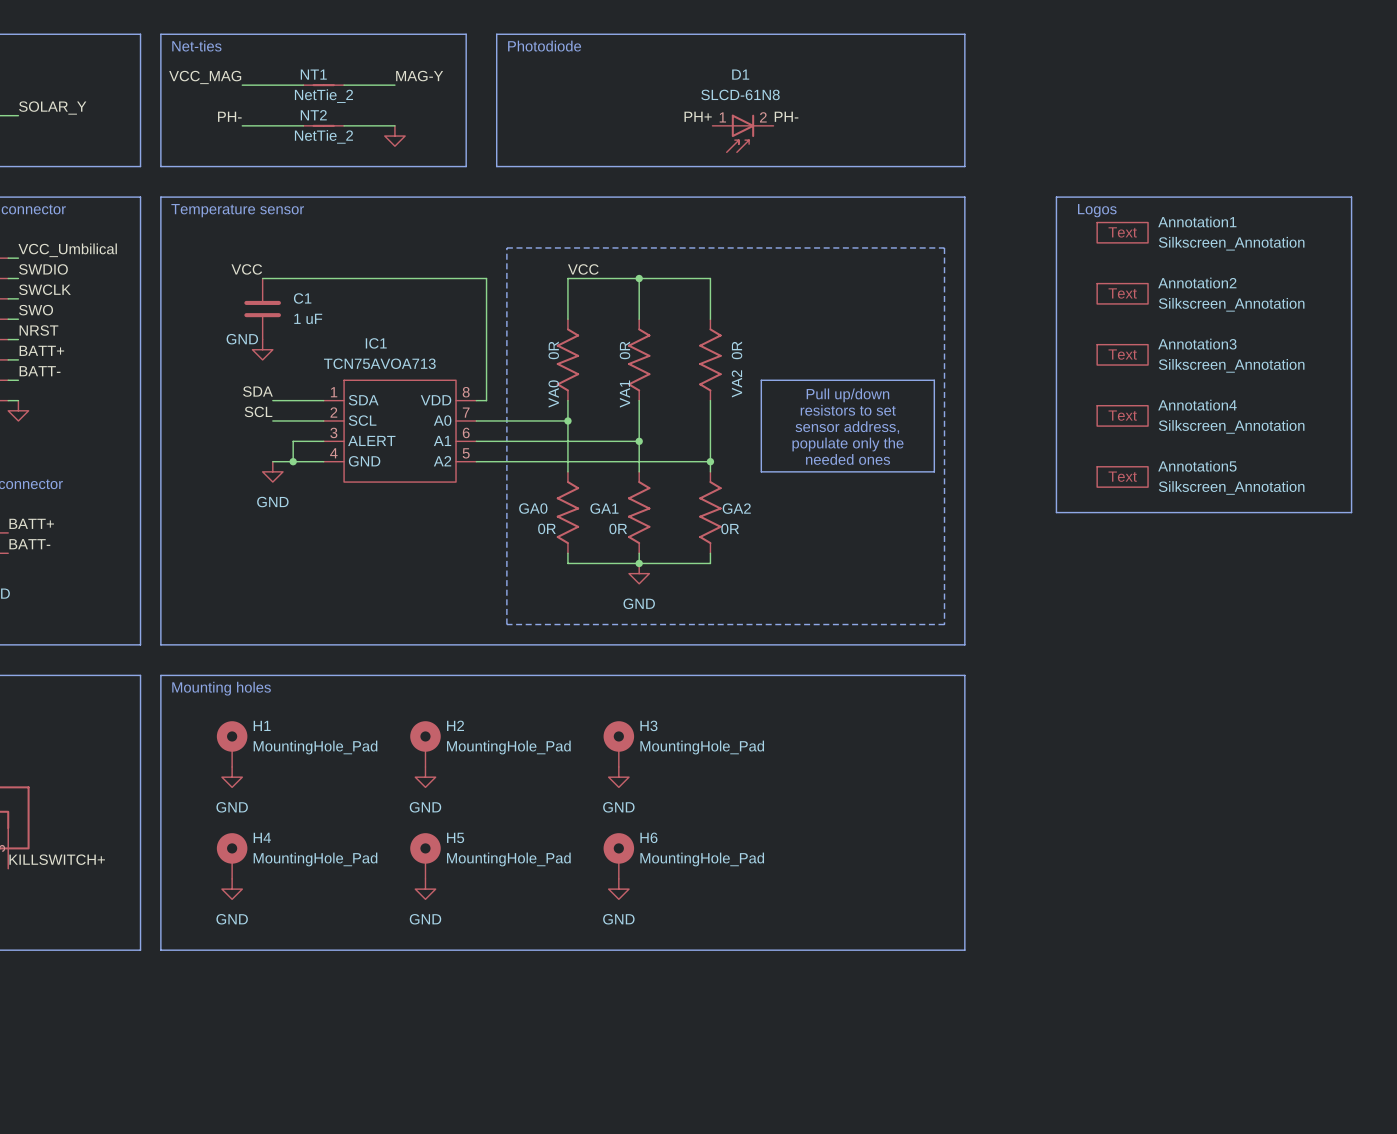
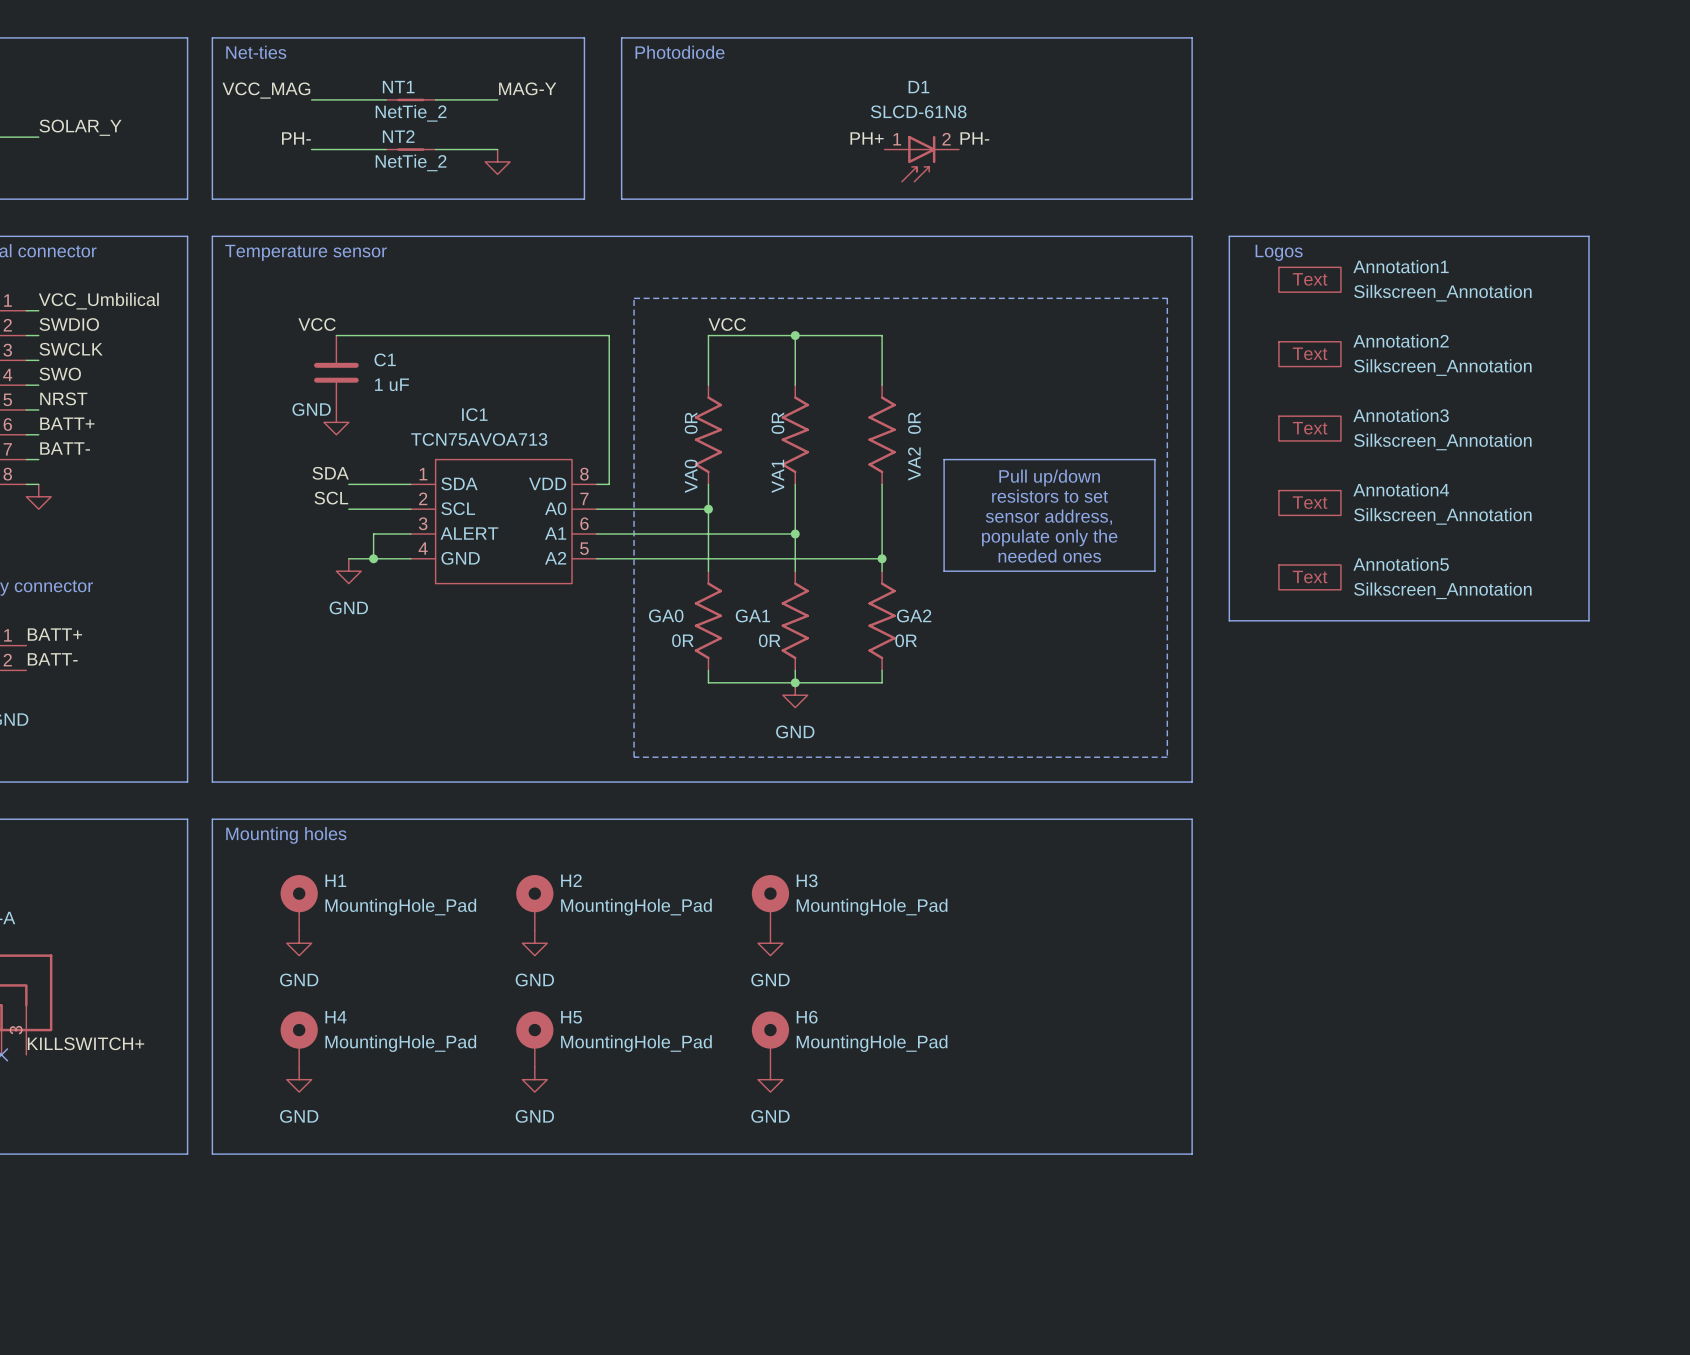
line: (1056, 197) (1056, 512) -> (1303, 236) (1229, 236) (1229, 620) (1303, 620)
line: (1290, 197) (1351, 197) (1351, 512) (1290, 512) -> (1588, 236) (1588, 620)
text position: Logos (1097, 210) -> Logos (1279, 252)
Annotation1 position: (1122, 232) -> (1309, 279)
Annotation2 position: (1122, 293) -> (1309, 354)
Annotation3 position: (1122, 354) -> (1309, 428)
Annotation4 position: (1122, 415) -> (1309, 502)
Annotation5 position: (1122, 476) -> (1309, 577)

